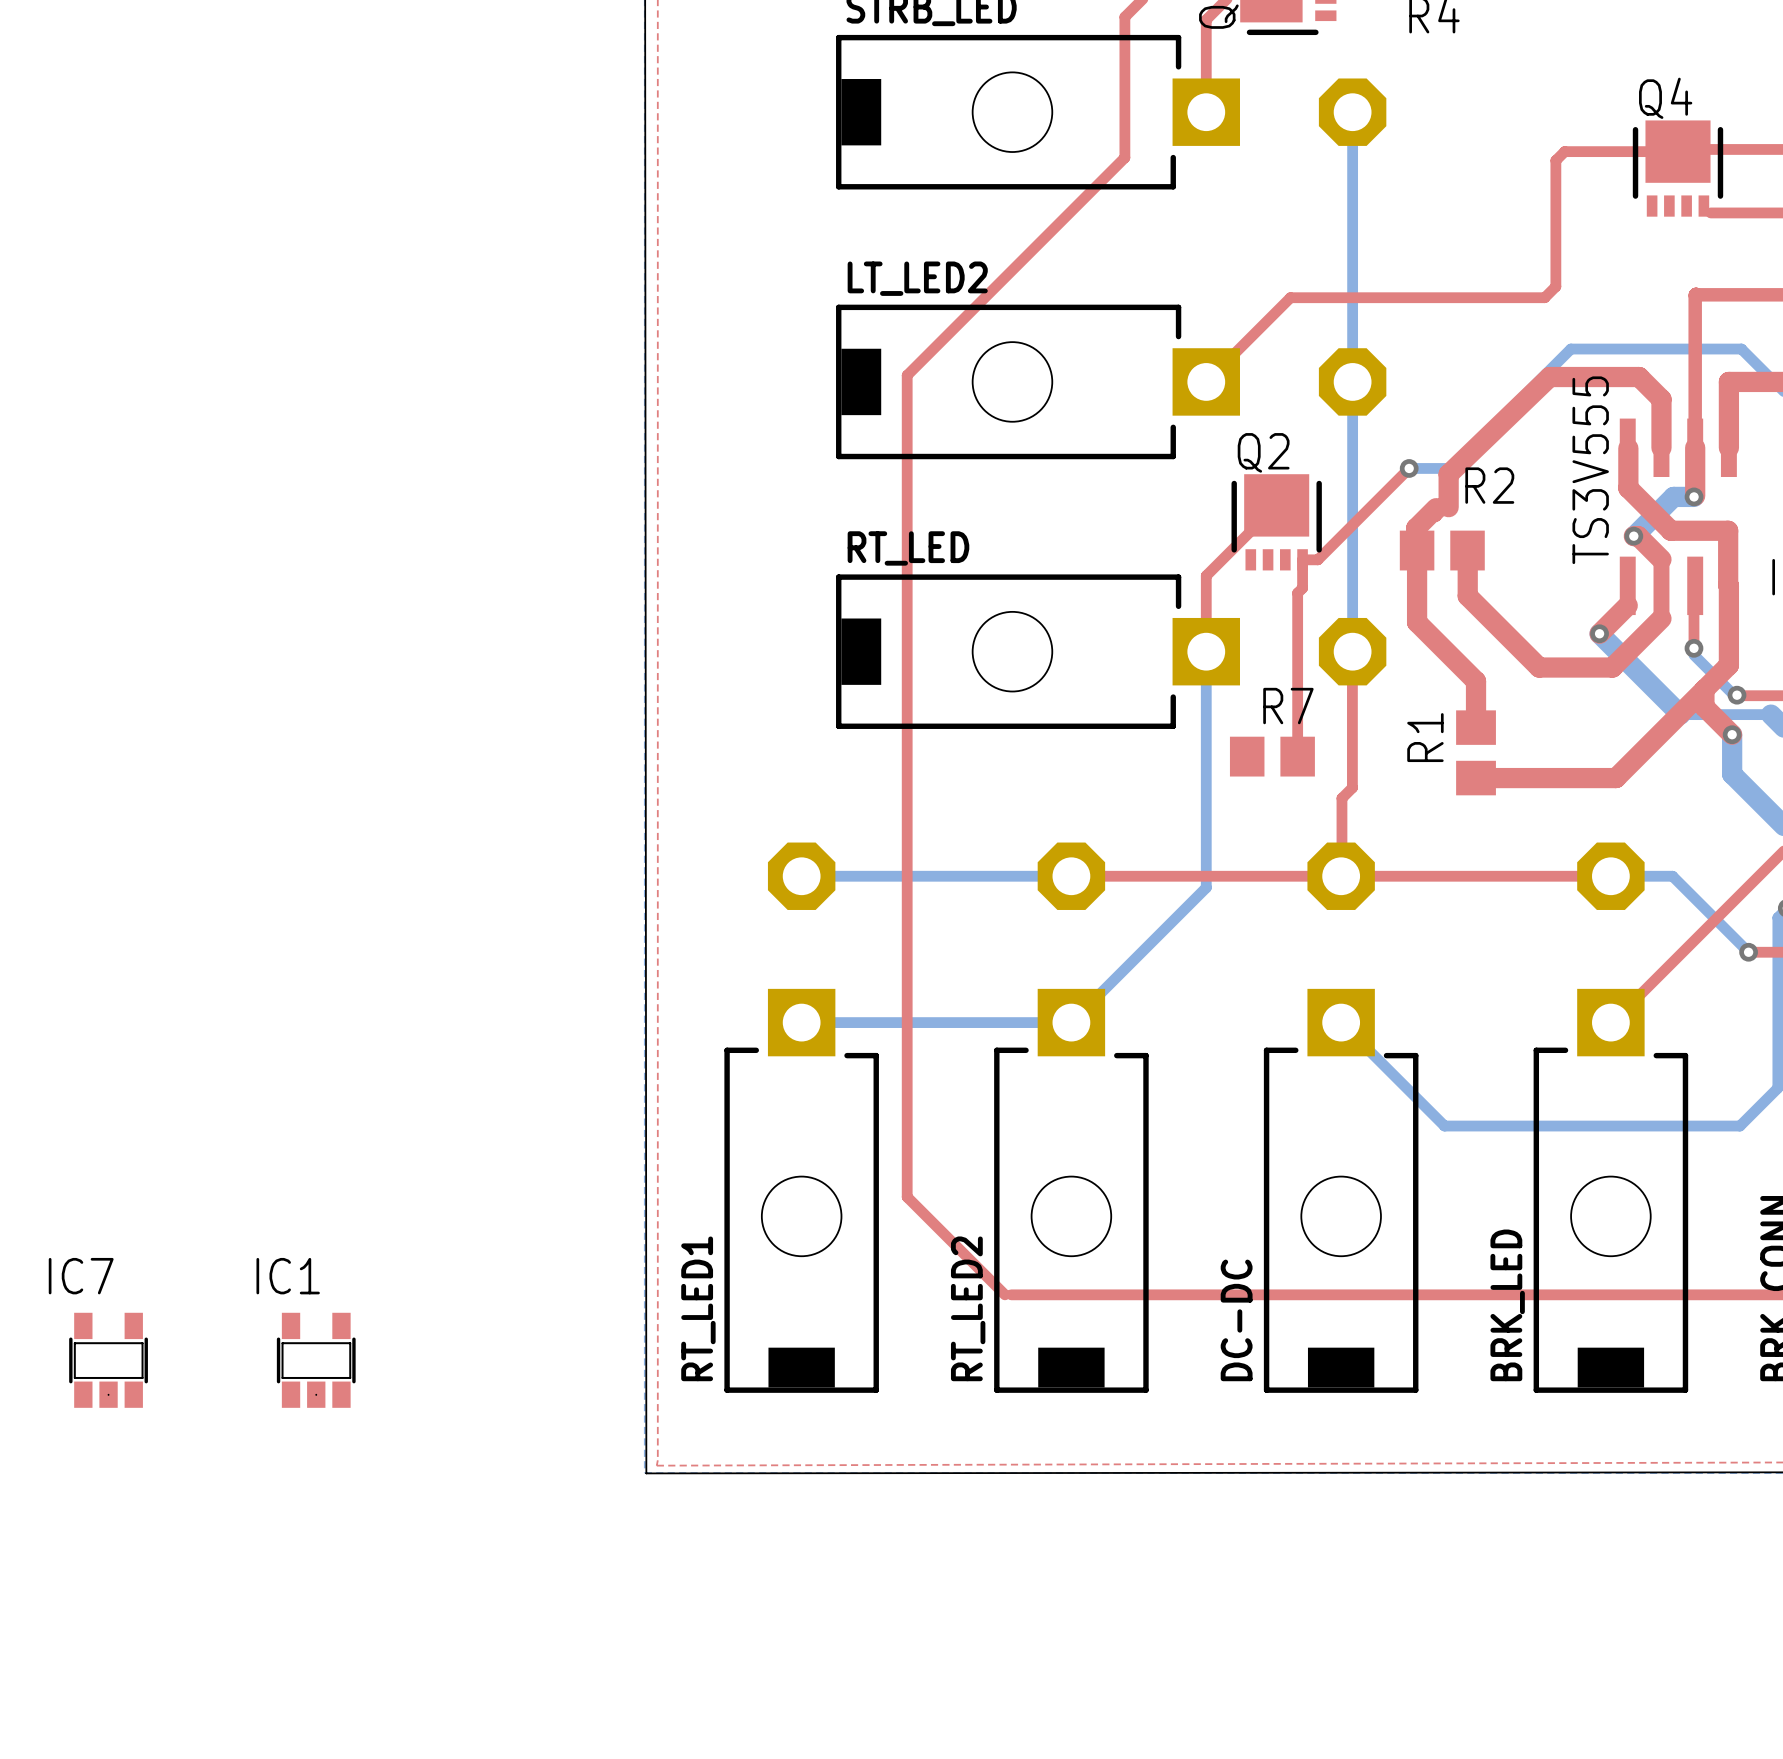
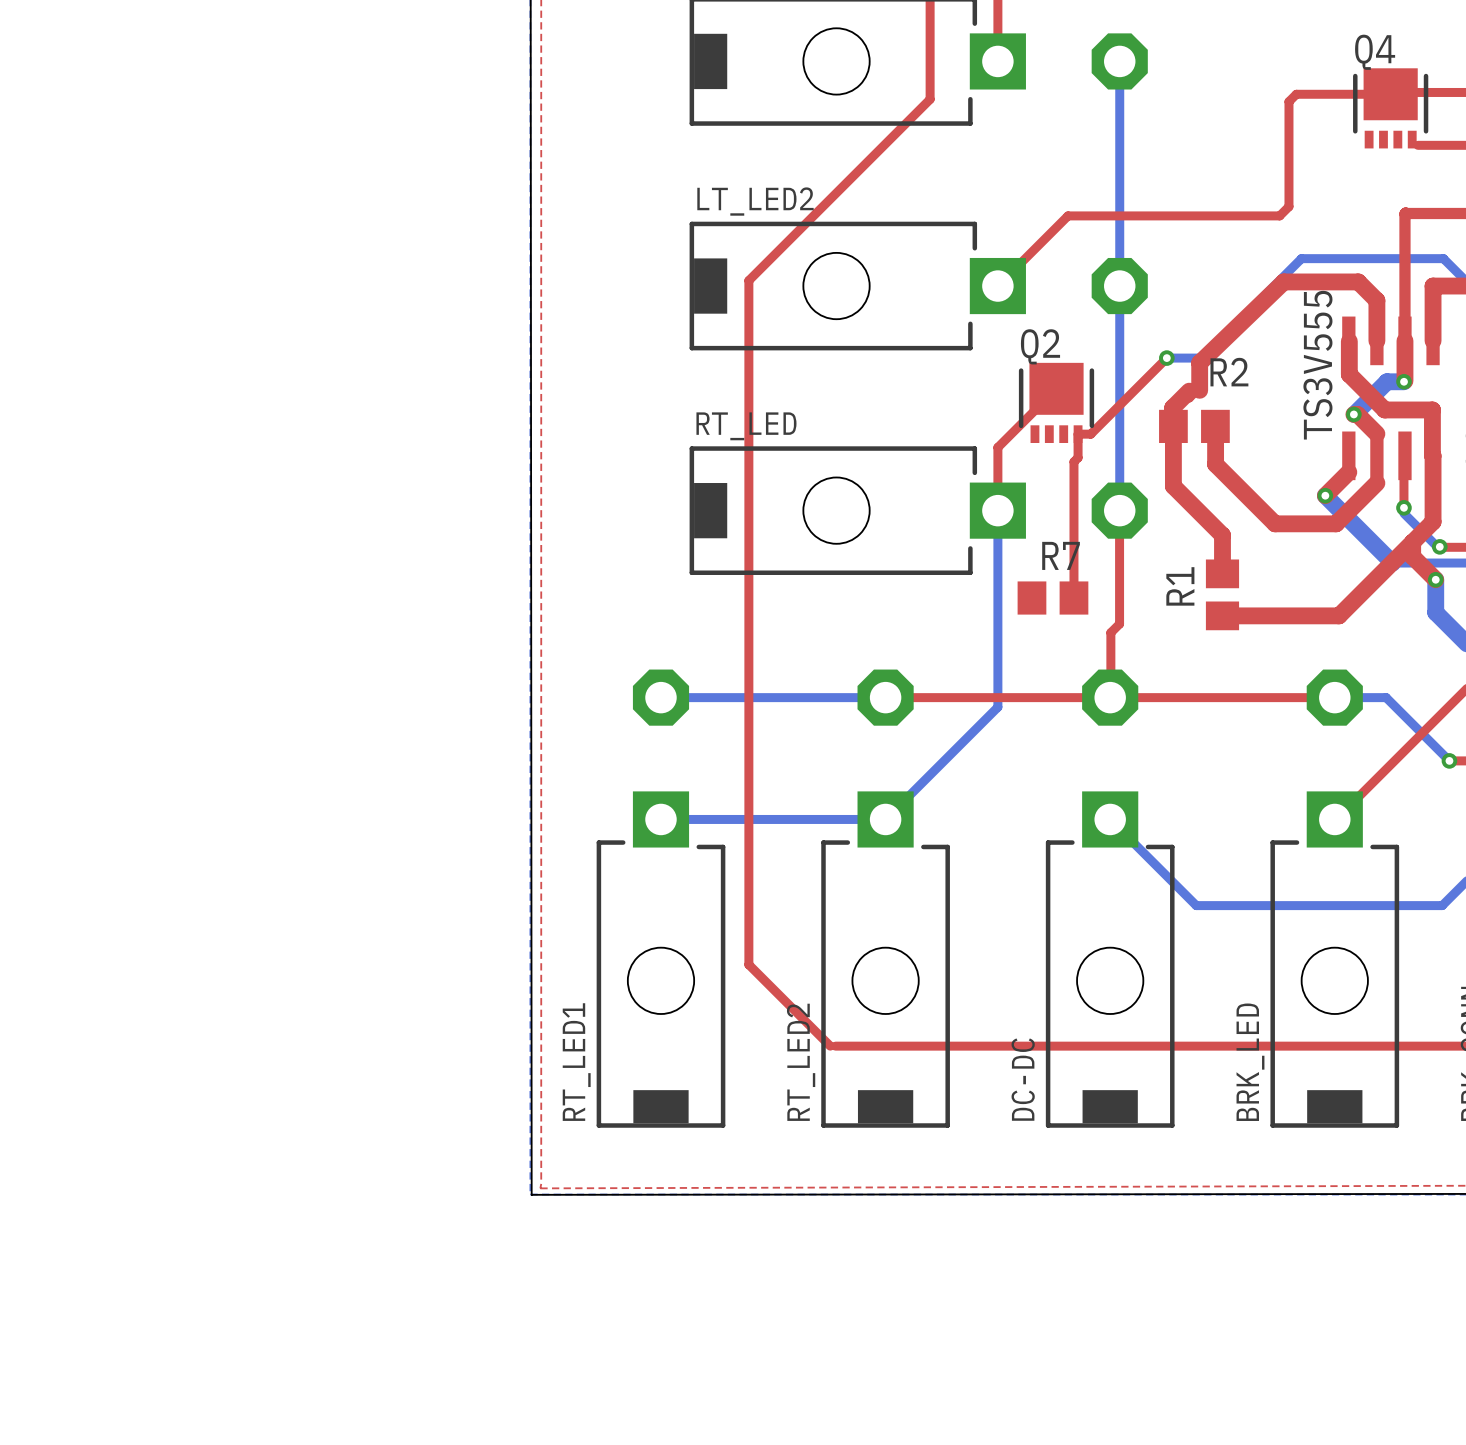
IC7: (108, 1360) -> none
IC1: (316, 1360) -> none

